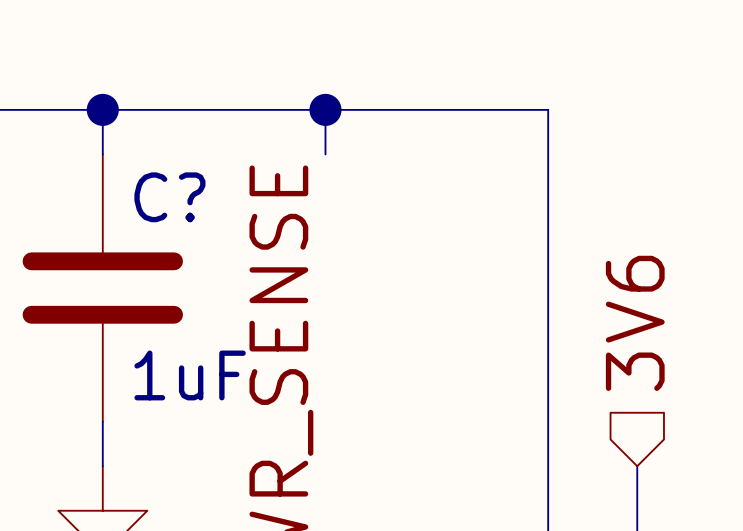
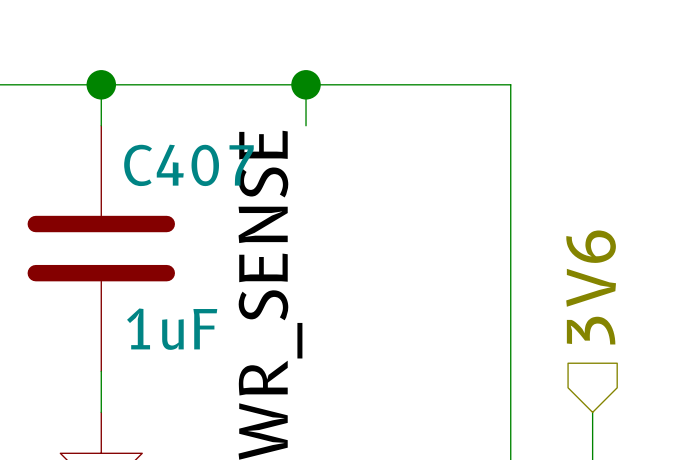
C? name: C? (169, 197) -> C407 (188, 165)

